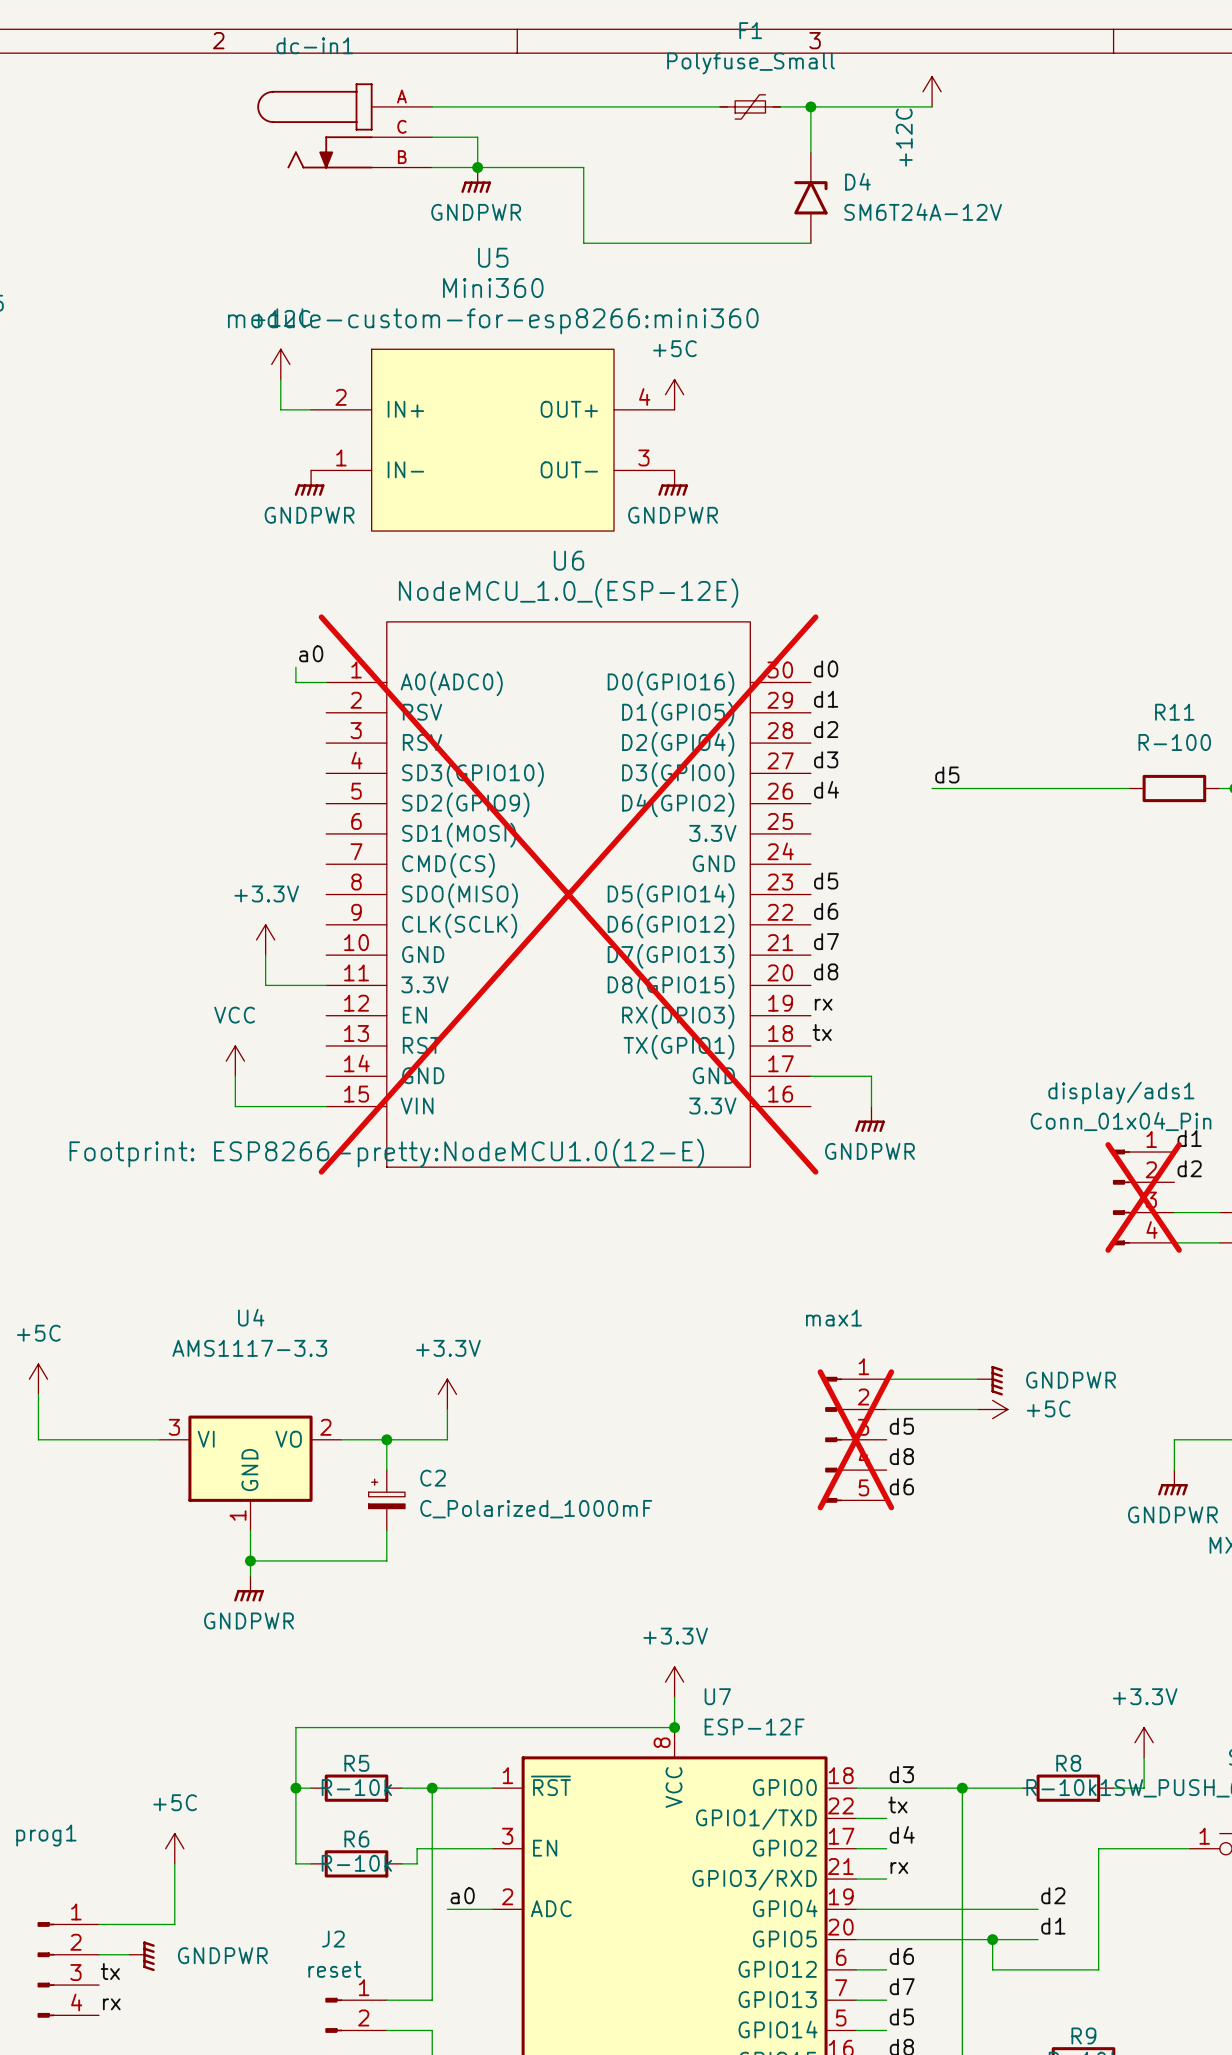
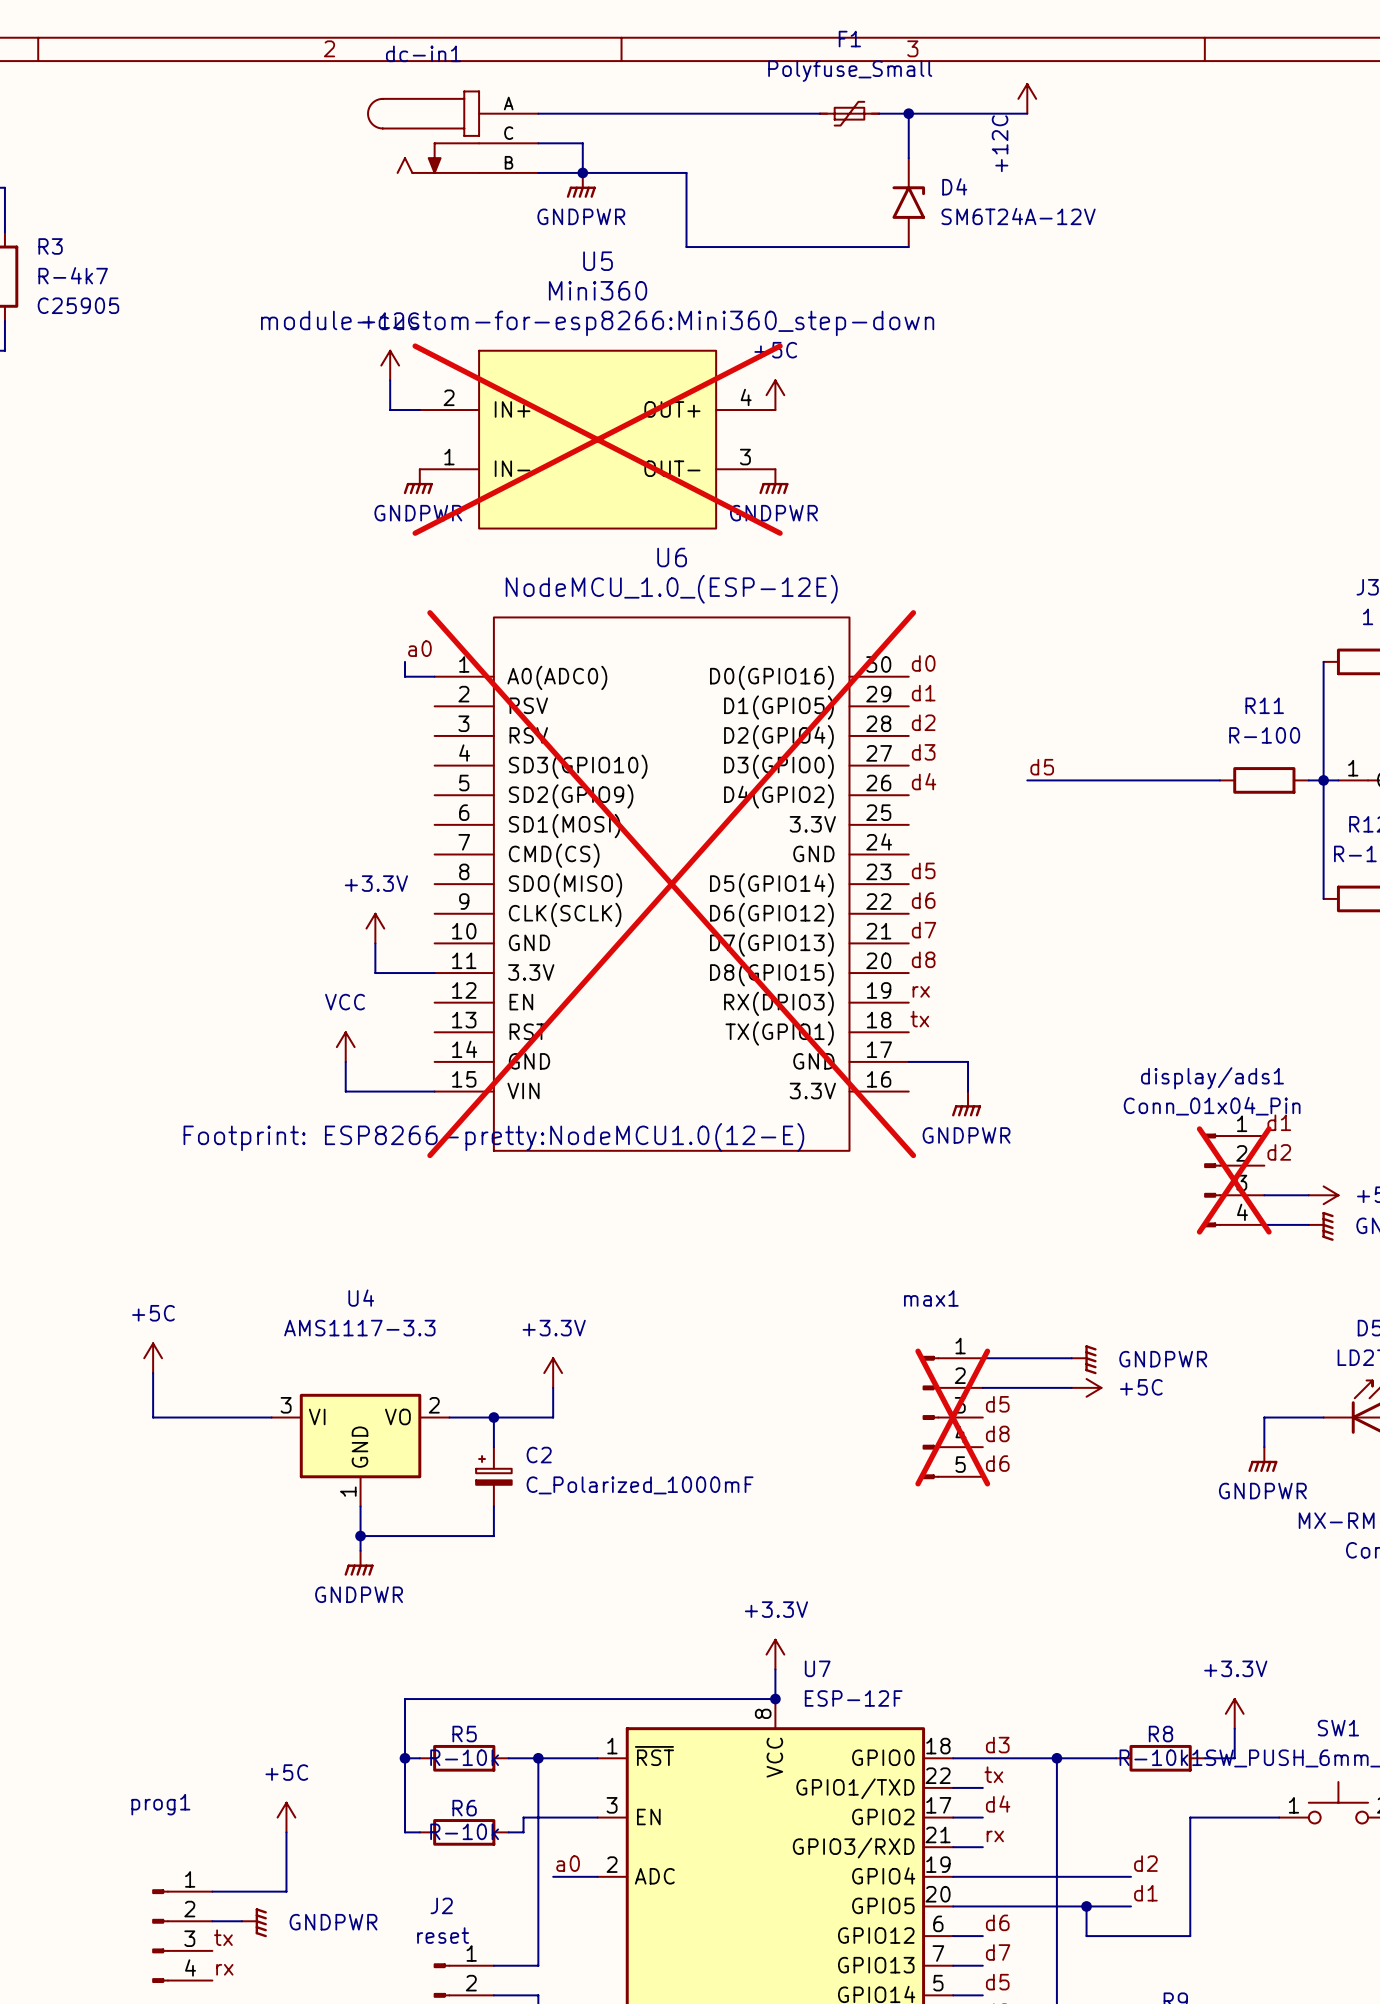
U5 text: module-custom-for-esp8266:mini360 (493, 321) -> module-custom-for-esp8266:Mini360_step-down (597, 323)
U5 do-not-place cross: none -> (597, 439)

